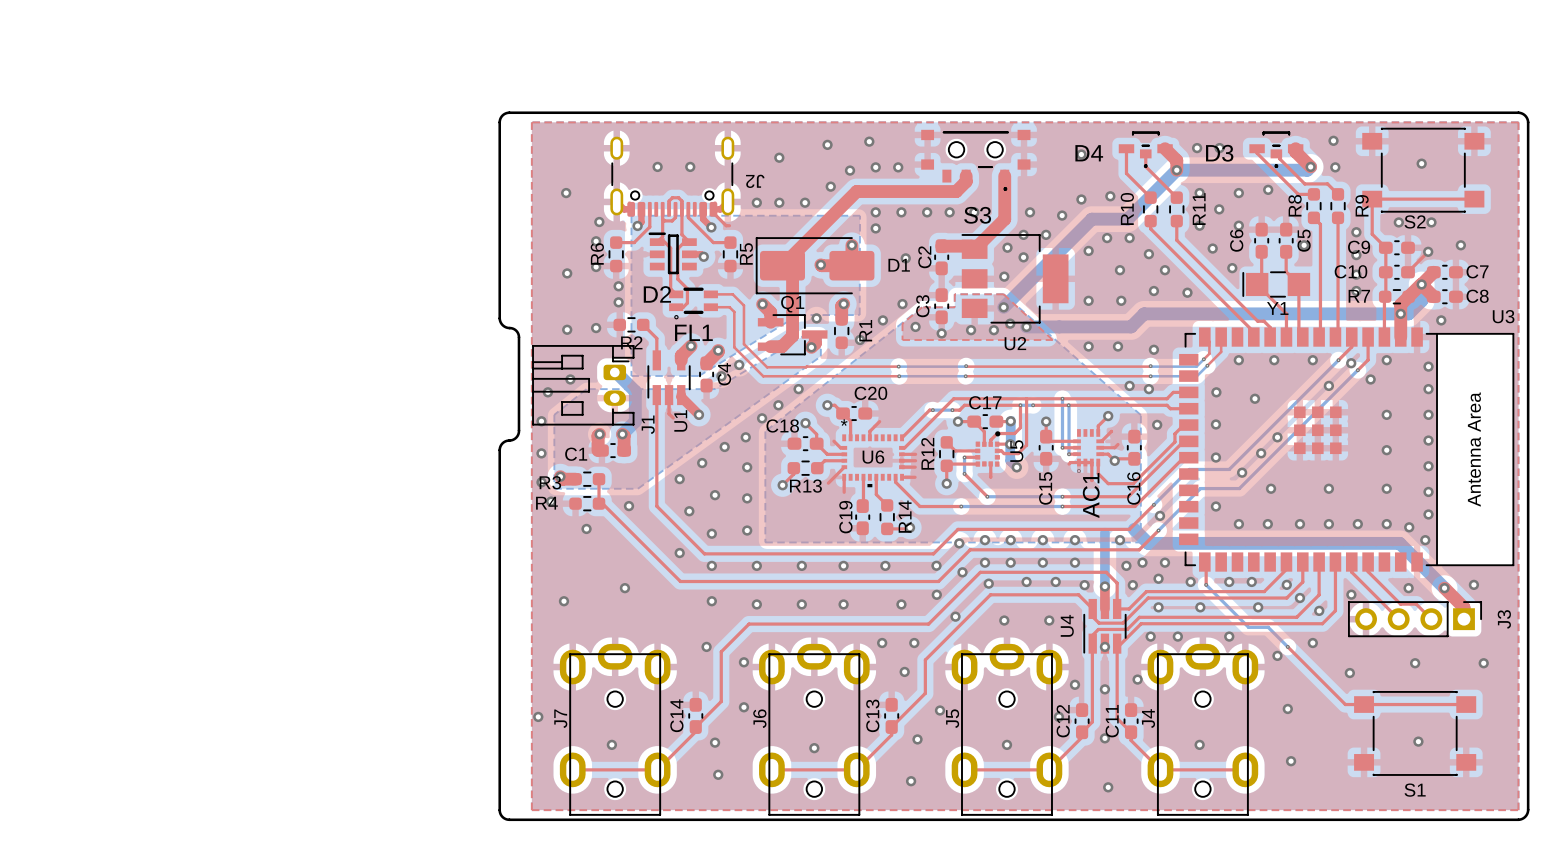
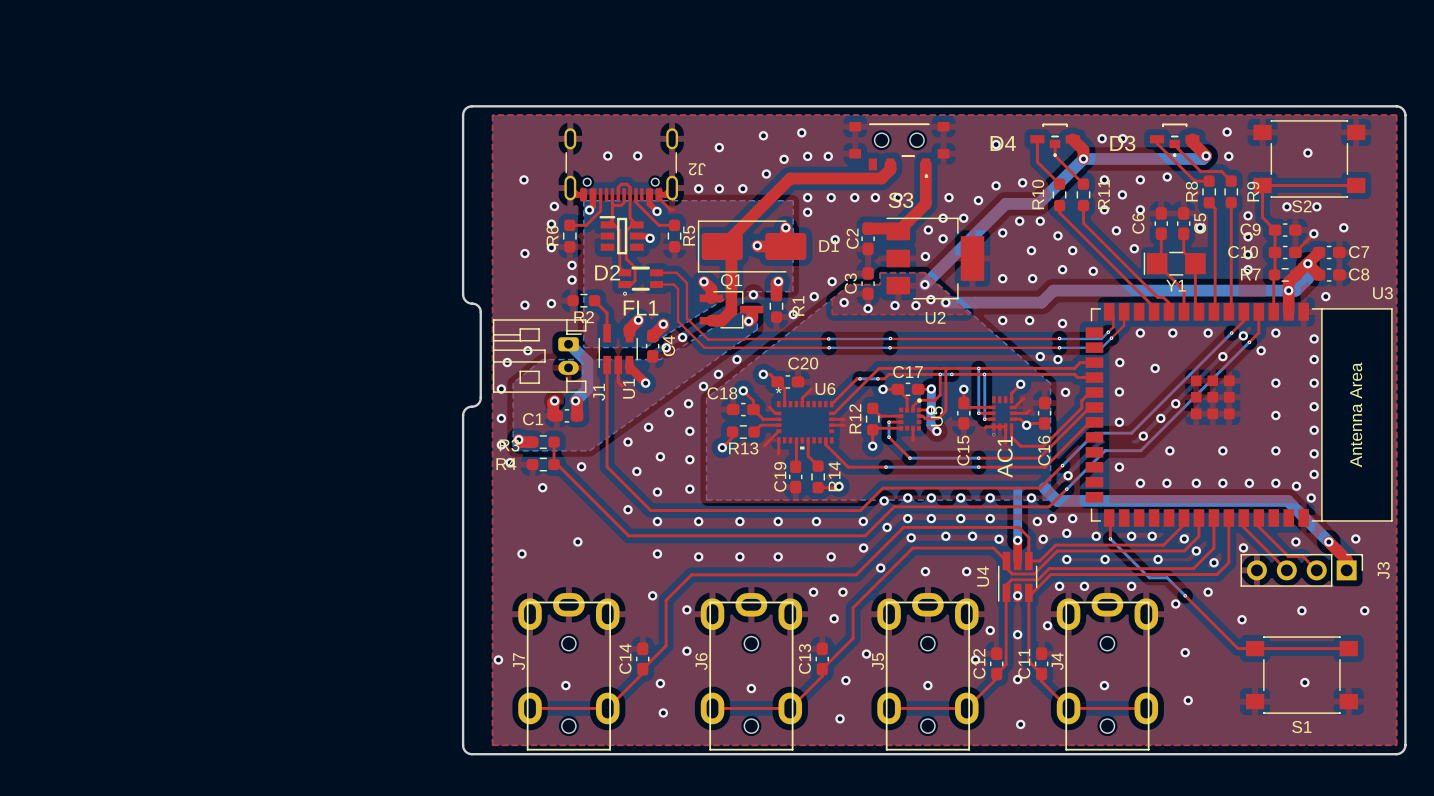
U6 name position: U6 (873, 457) -> U6 (825, 388)
top track: (901, 467) (915, 467) -> none
top track: (902, 477) (915, 477) -> none

